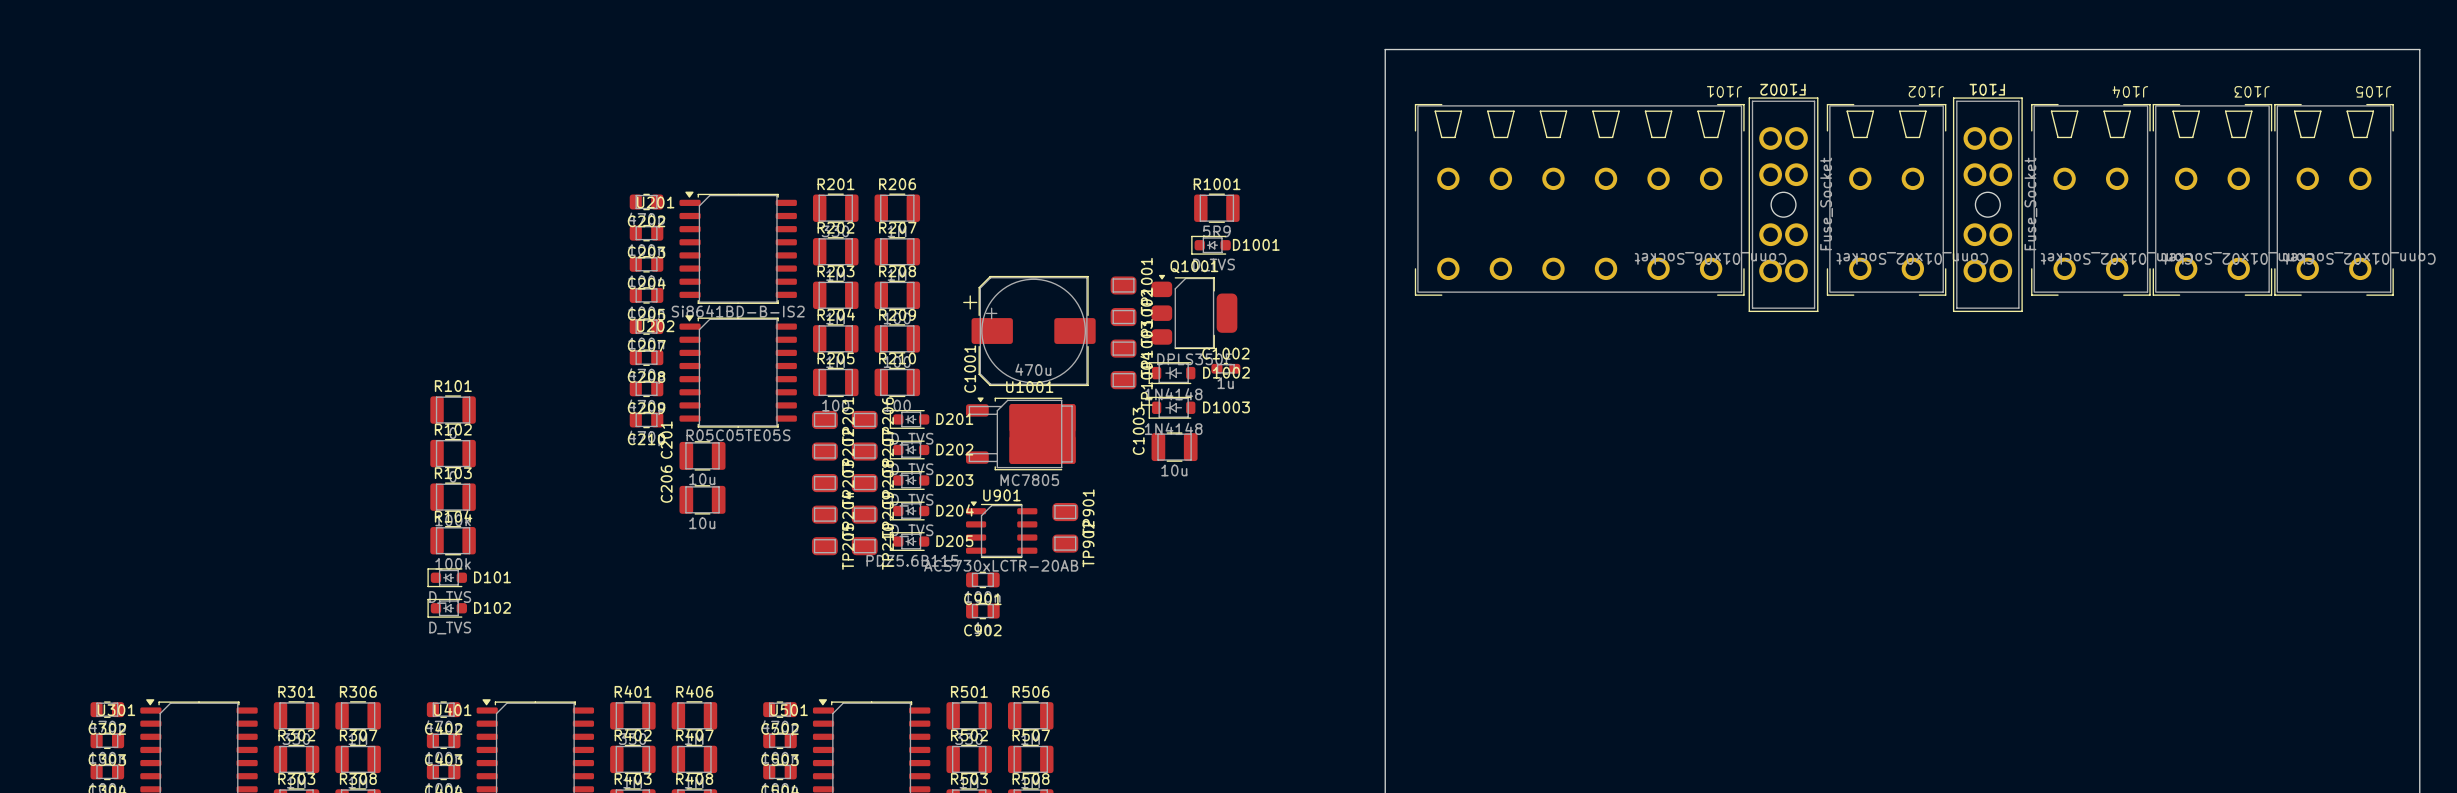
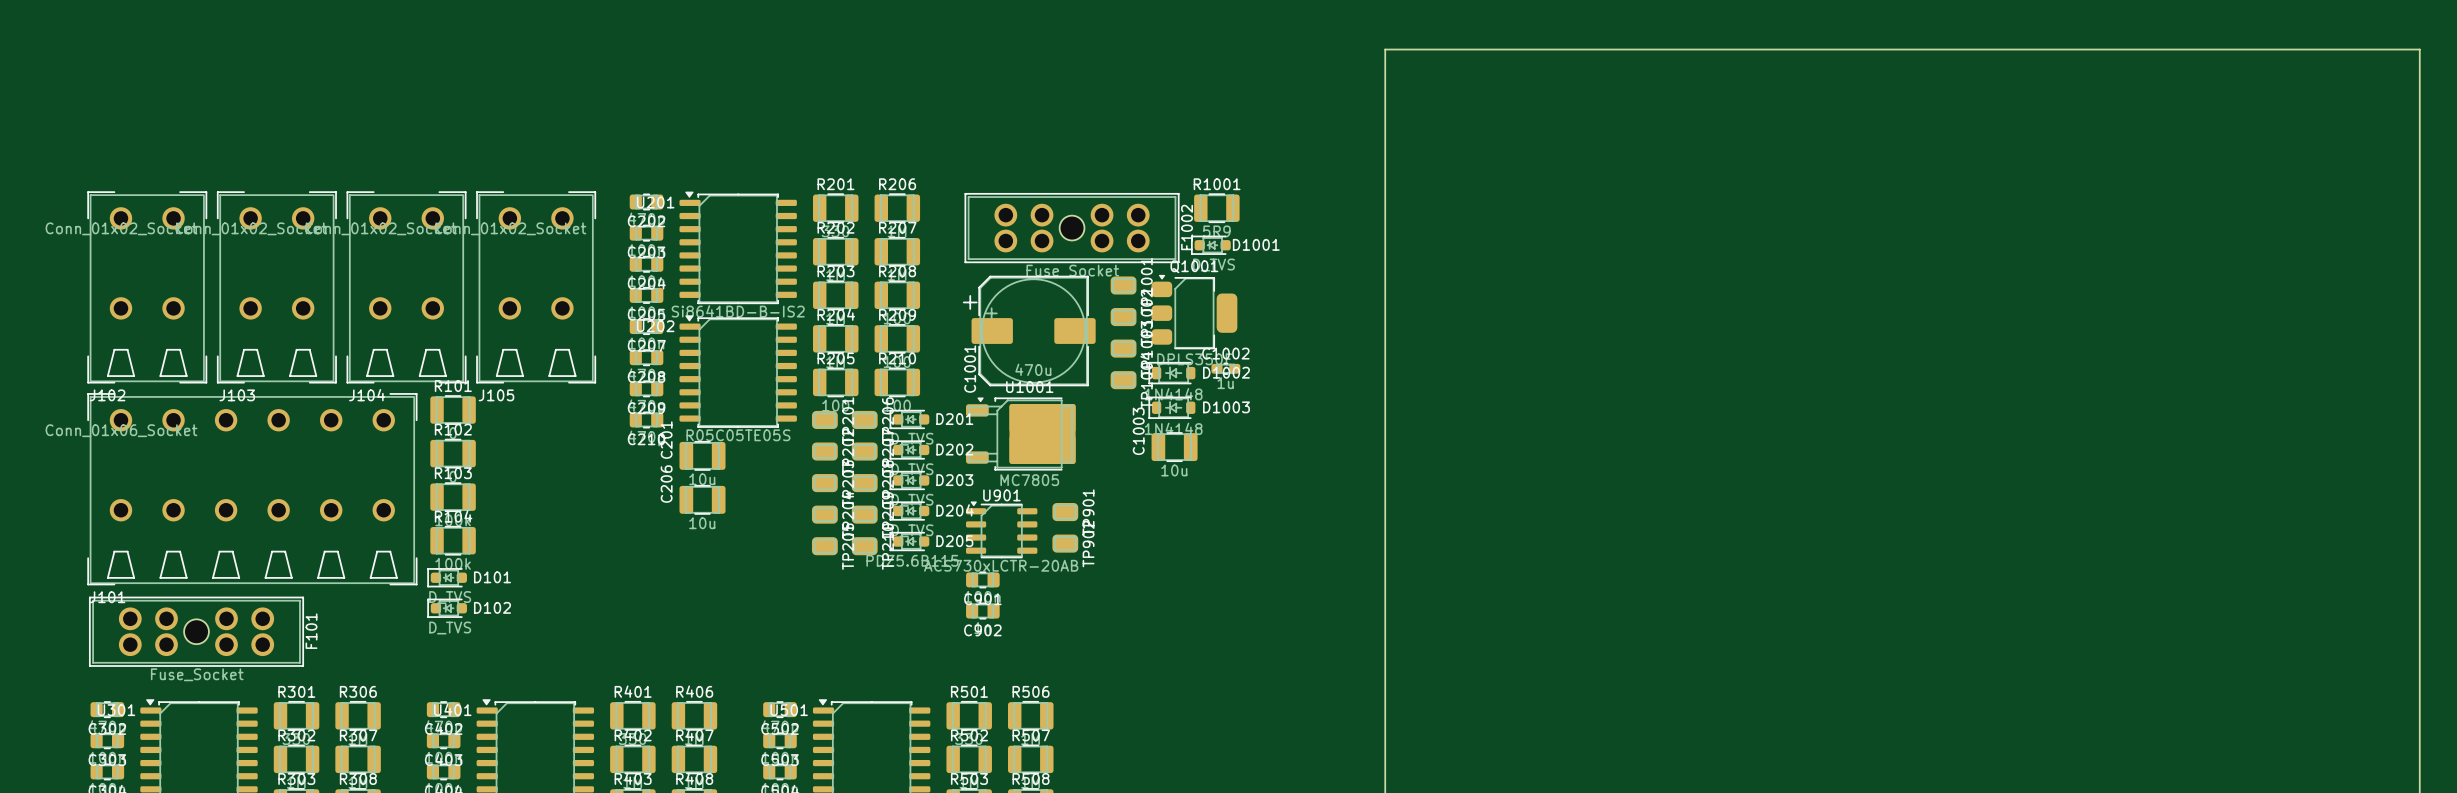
J101 rotation: 0° (1579, 199) -> 180° (252, 489)
J101 position: (1579, 199) -> (252, 489)
J102 rotation: 0° (1886, 199) -> 180° (147, 287)
J102 position: (1886, 199) -> (147, 287)
J104 rotation: 0° (2090, 199) -> 180° (406, 287)
J104 position: (2090, 199) -> (406, 287)
J103 rotation: 0° (2212, 199) -> 180° (276, 287)
J103 position: (2212, 199) -> (276, 287)
J105 rotation: 0° (2334, 199) -> 180° (536, 287)
J105 position: (2334, 199) -> (536, 287)
F1002 rotation: 0° (1783, 204) -> 90° clockwise (1072, 228)
F1002 position: (1783, 204) -> (1072, 228)
F101 rotation: 0° (1987, 204) -> 90° clockwise (196, 631)
F101 position: (1987, 204) -> (196, 631)

